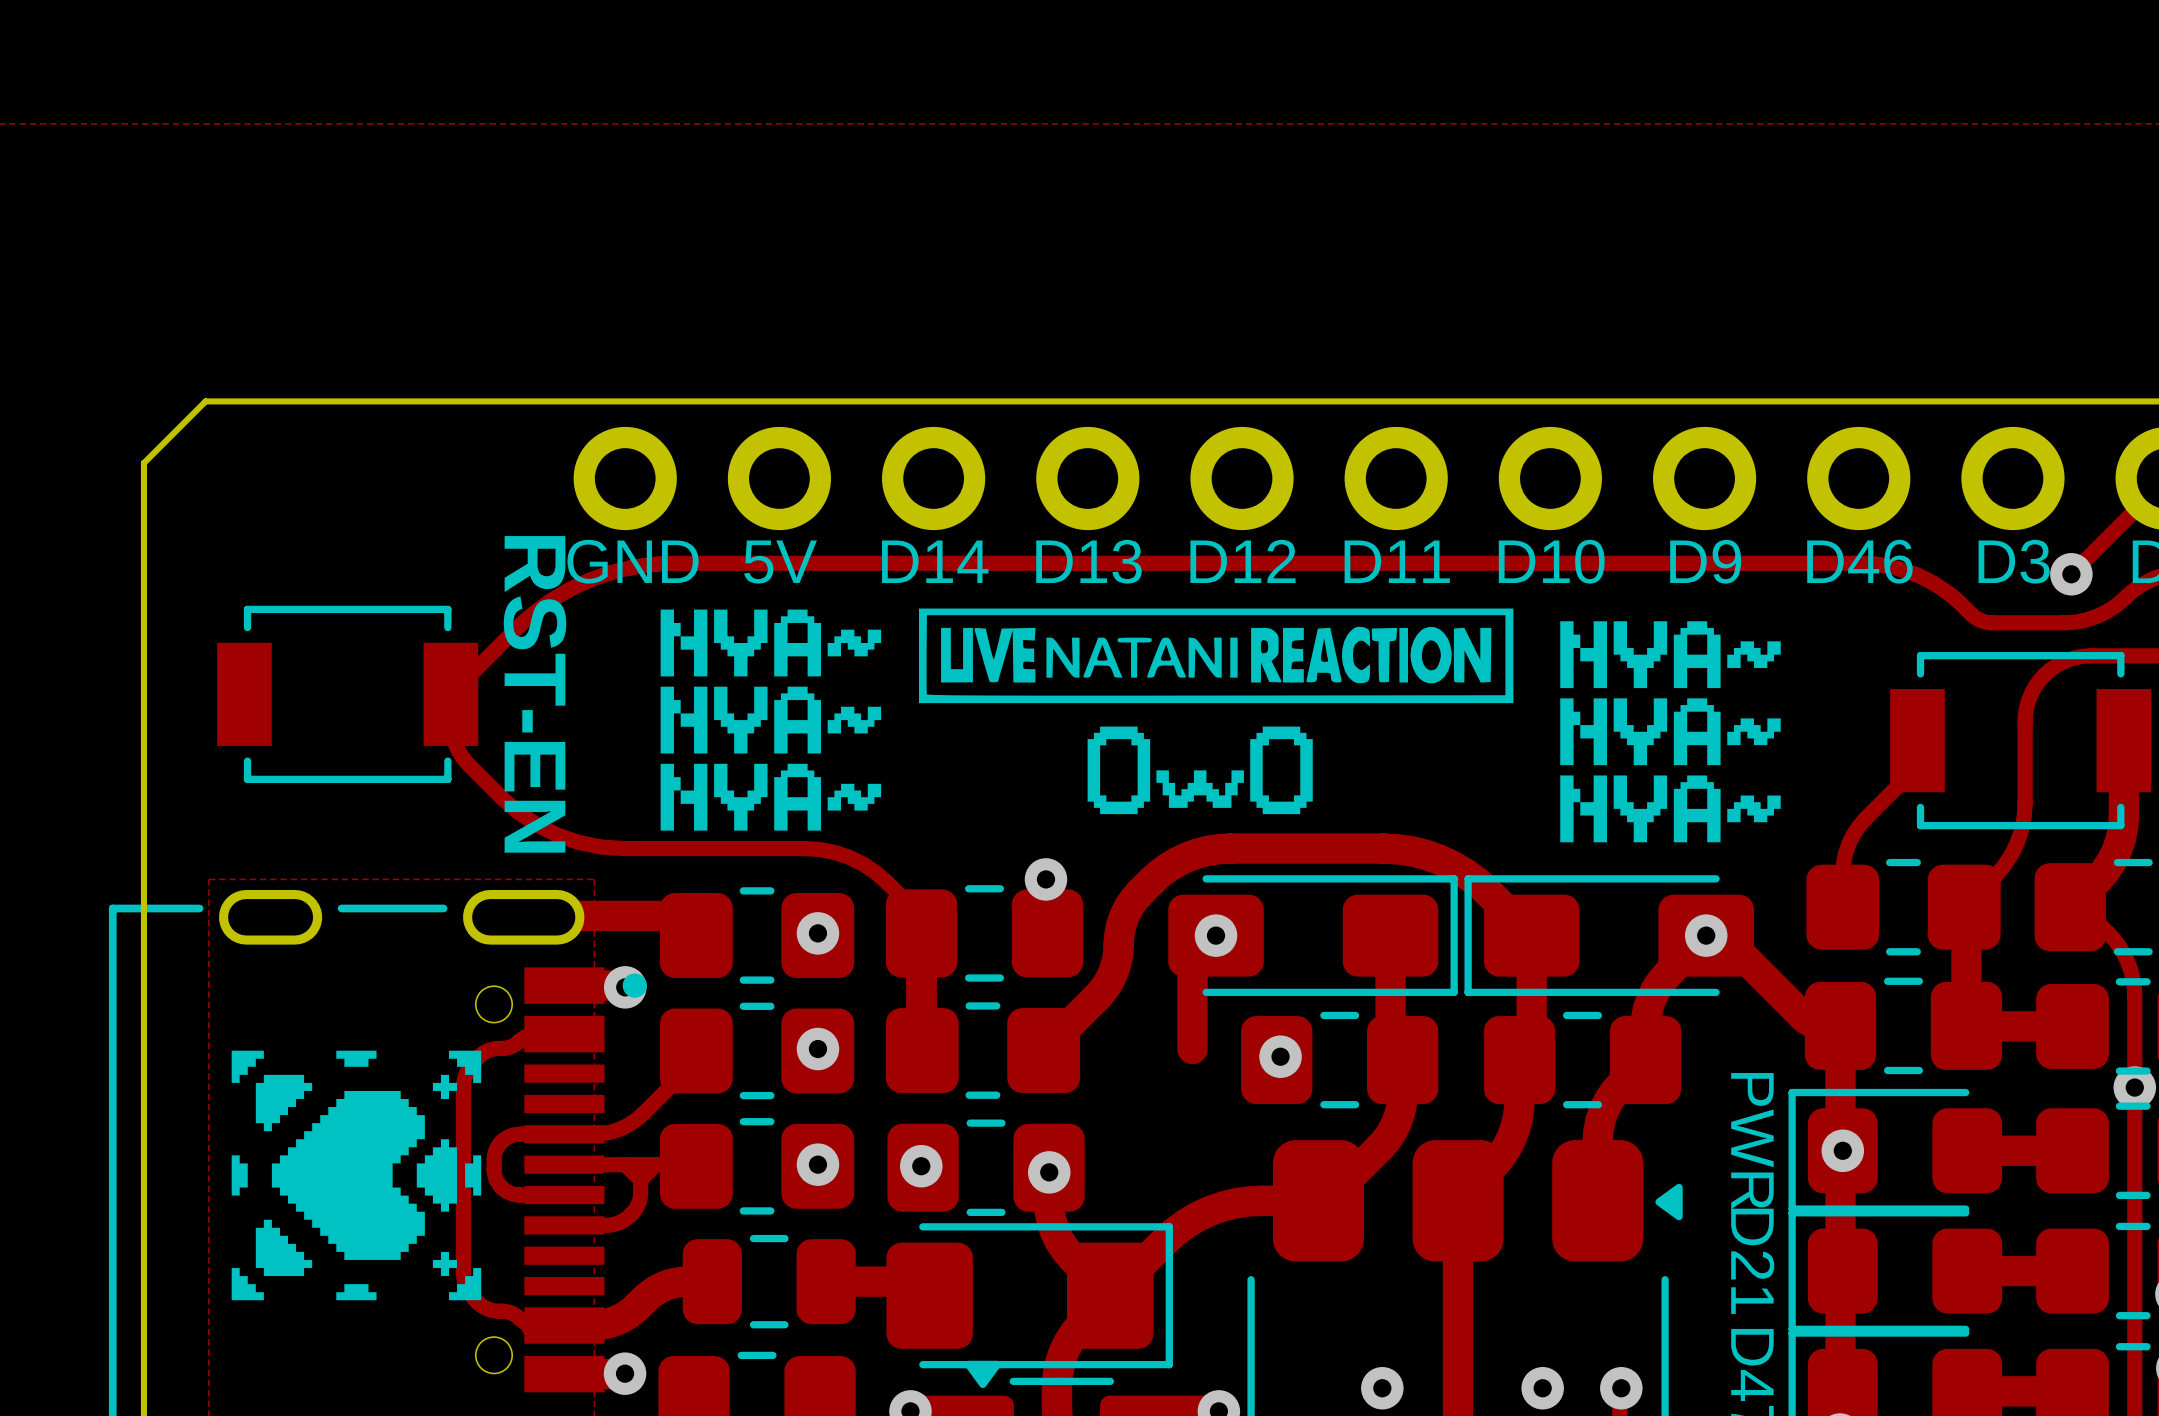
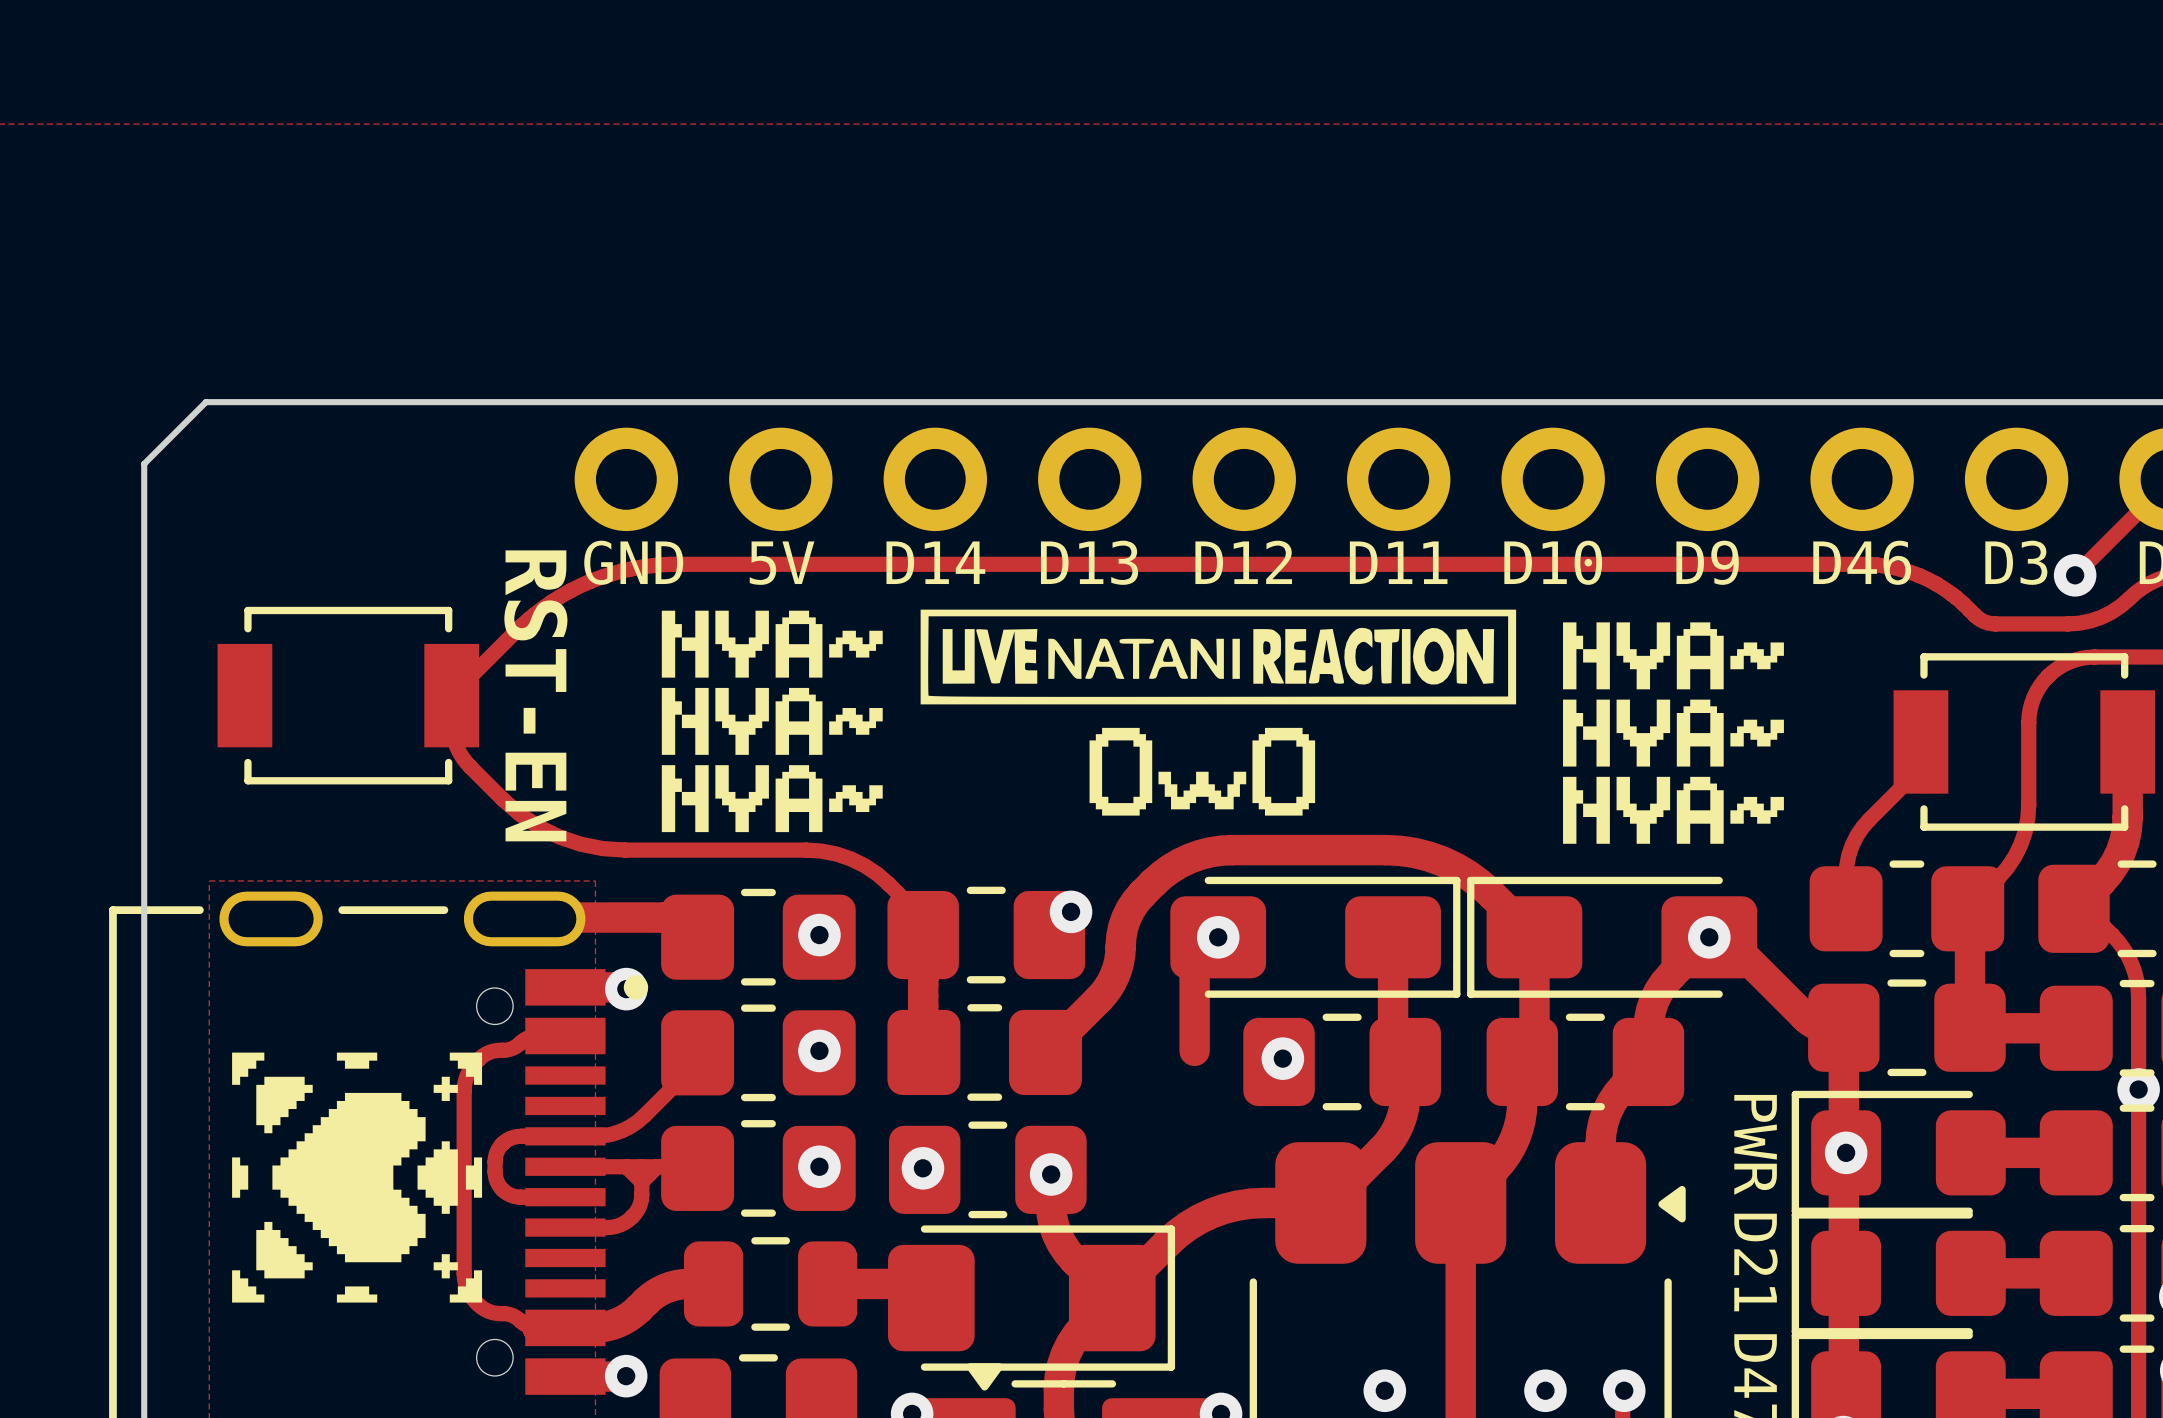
via position: (1045, 879) -> (1071, 911)

